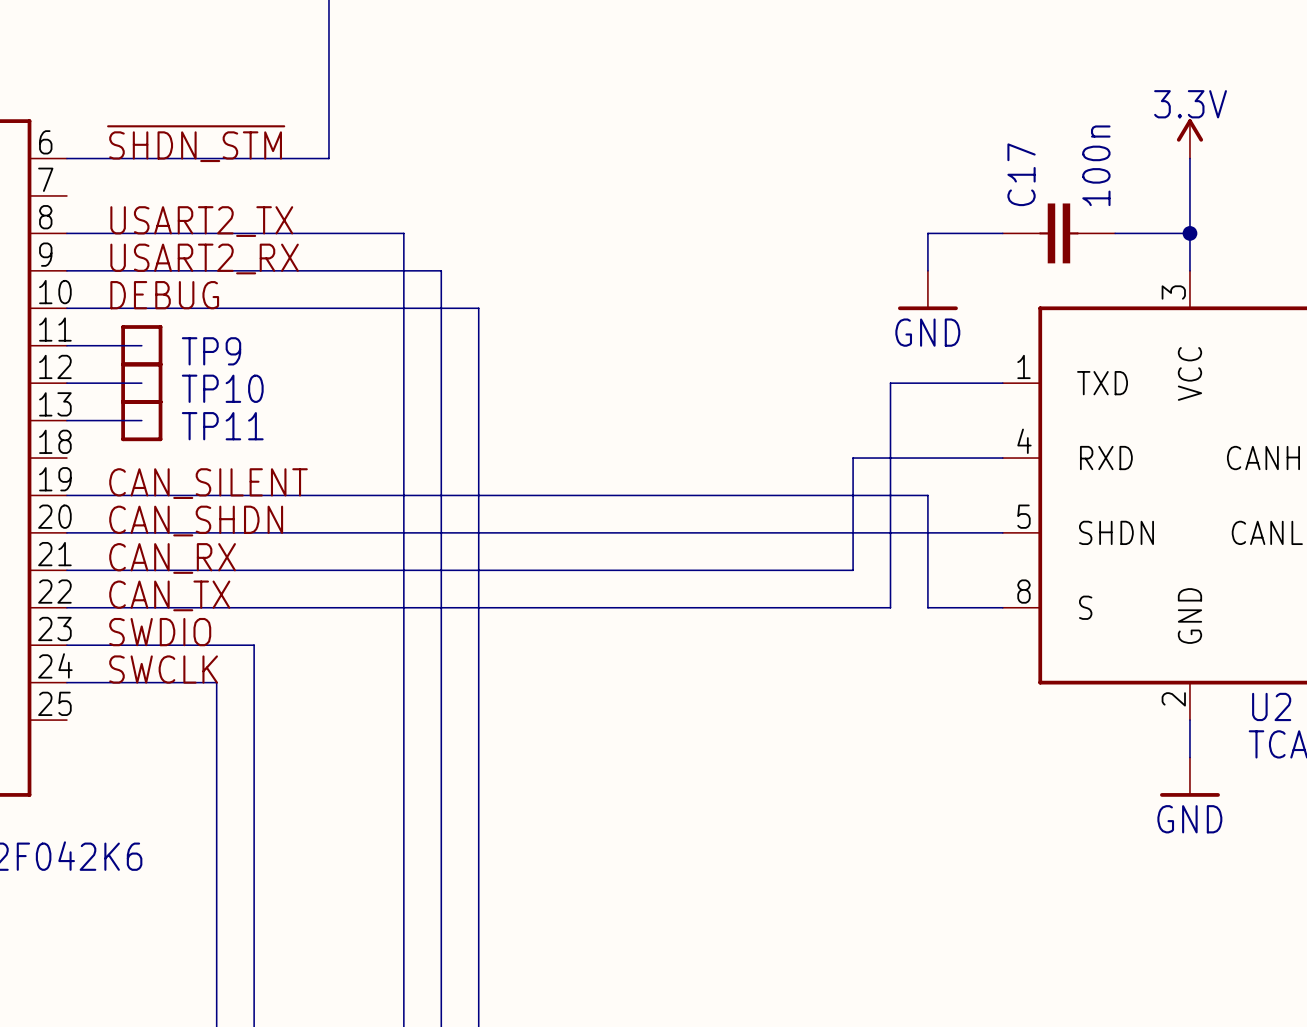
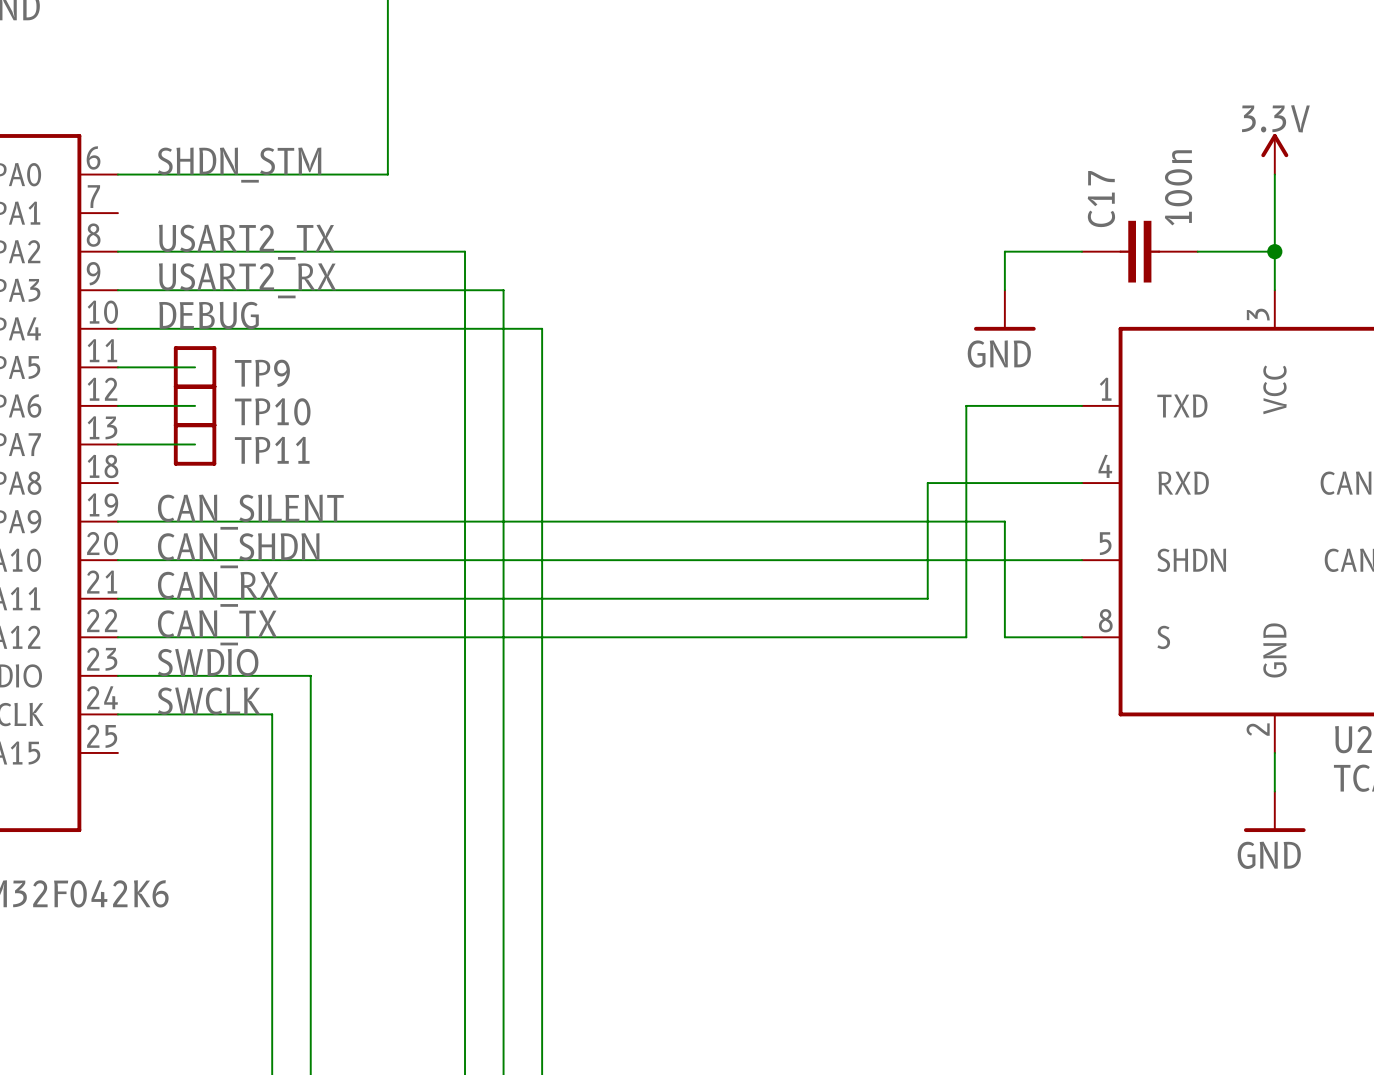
label: ~{SHDN_STM} (196, 143) -> SHDN_STM (239, 165)

